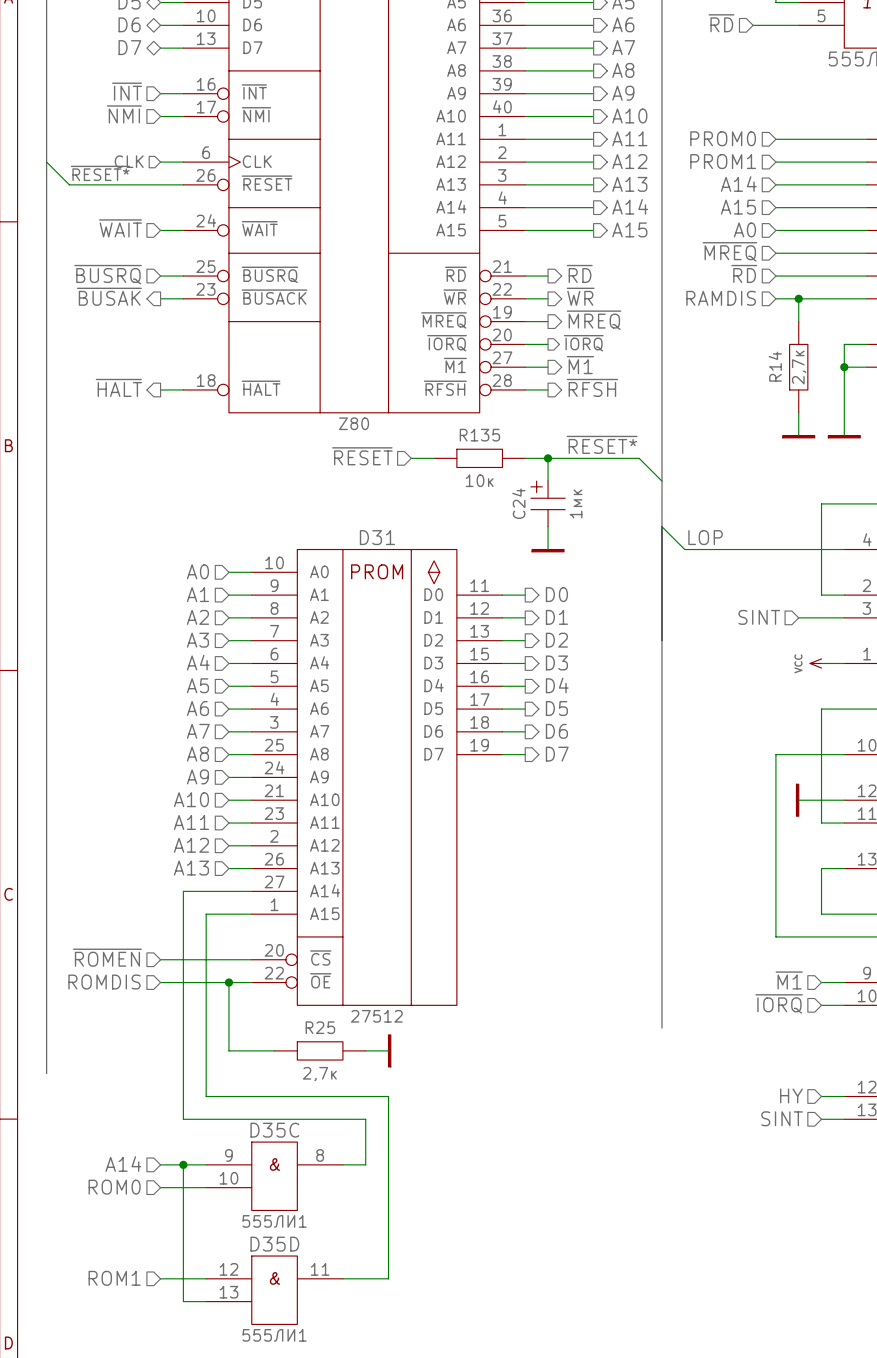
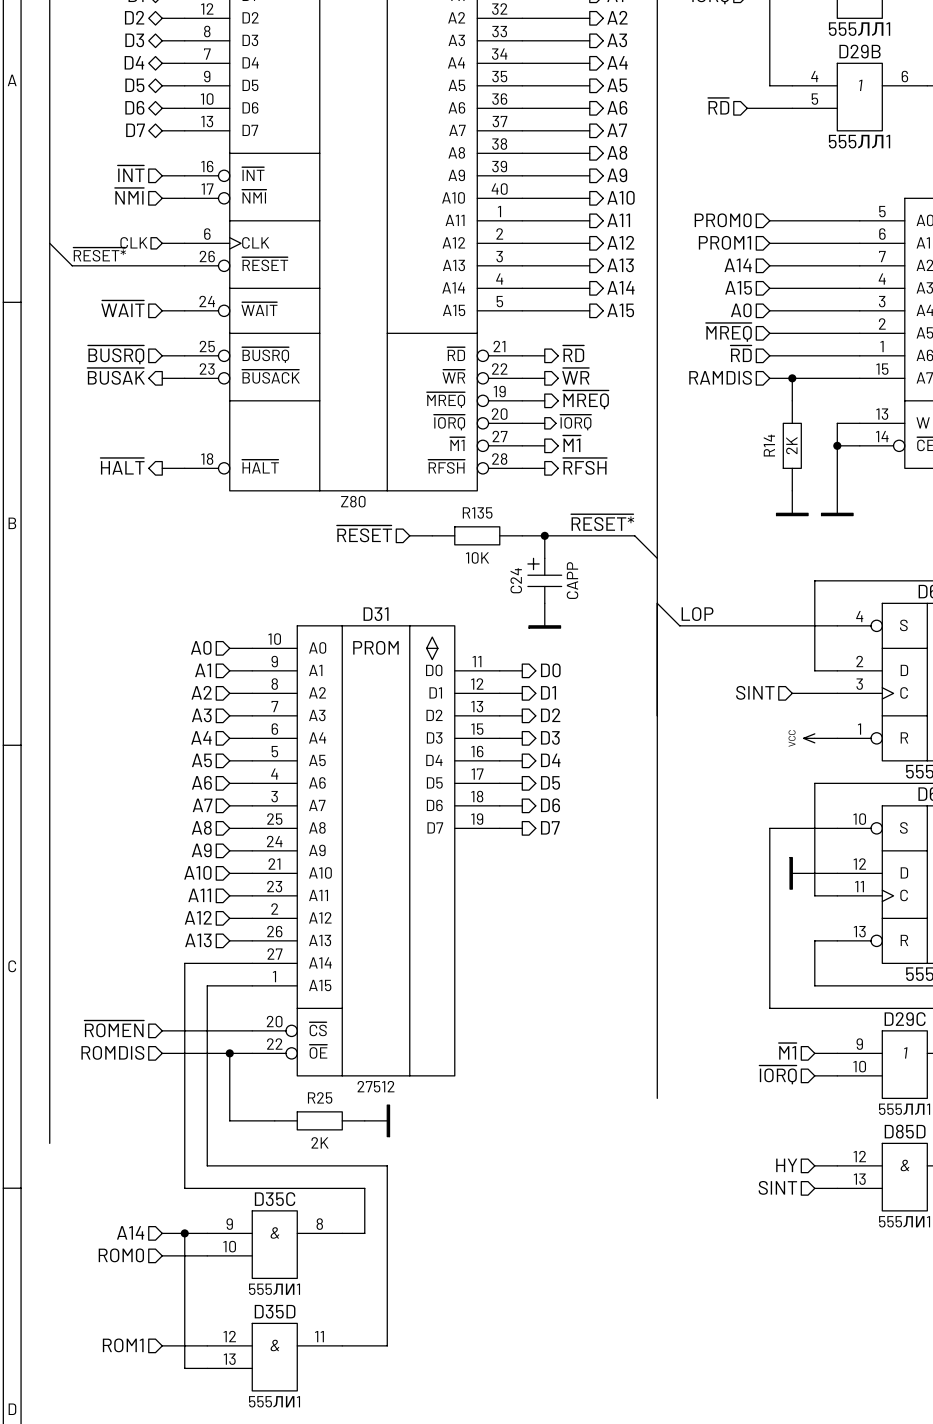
R14 value: 2,7к (799, 367) -> 2K (791, 445)
R135 value: 10к (479, 480) -> 10K (477, 557)
C24 value: 1мк (576, 503) -> CAPP (572, 580)
R25 value: 2,7к (319, 1074) -> 2K (320, 1142)

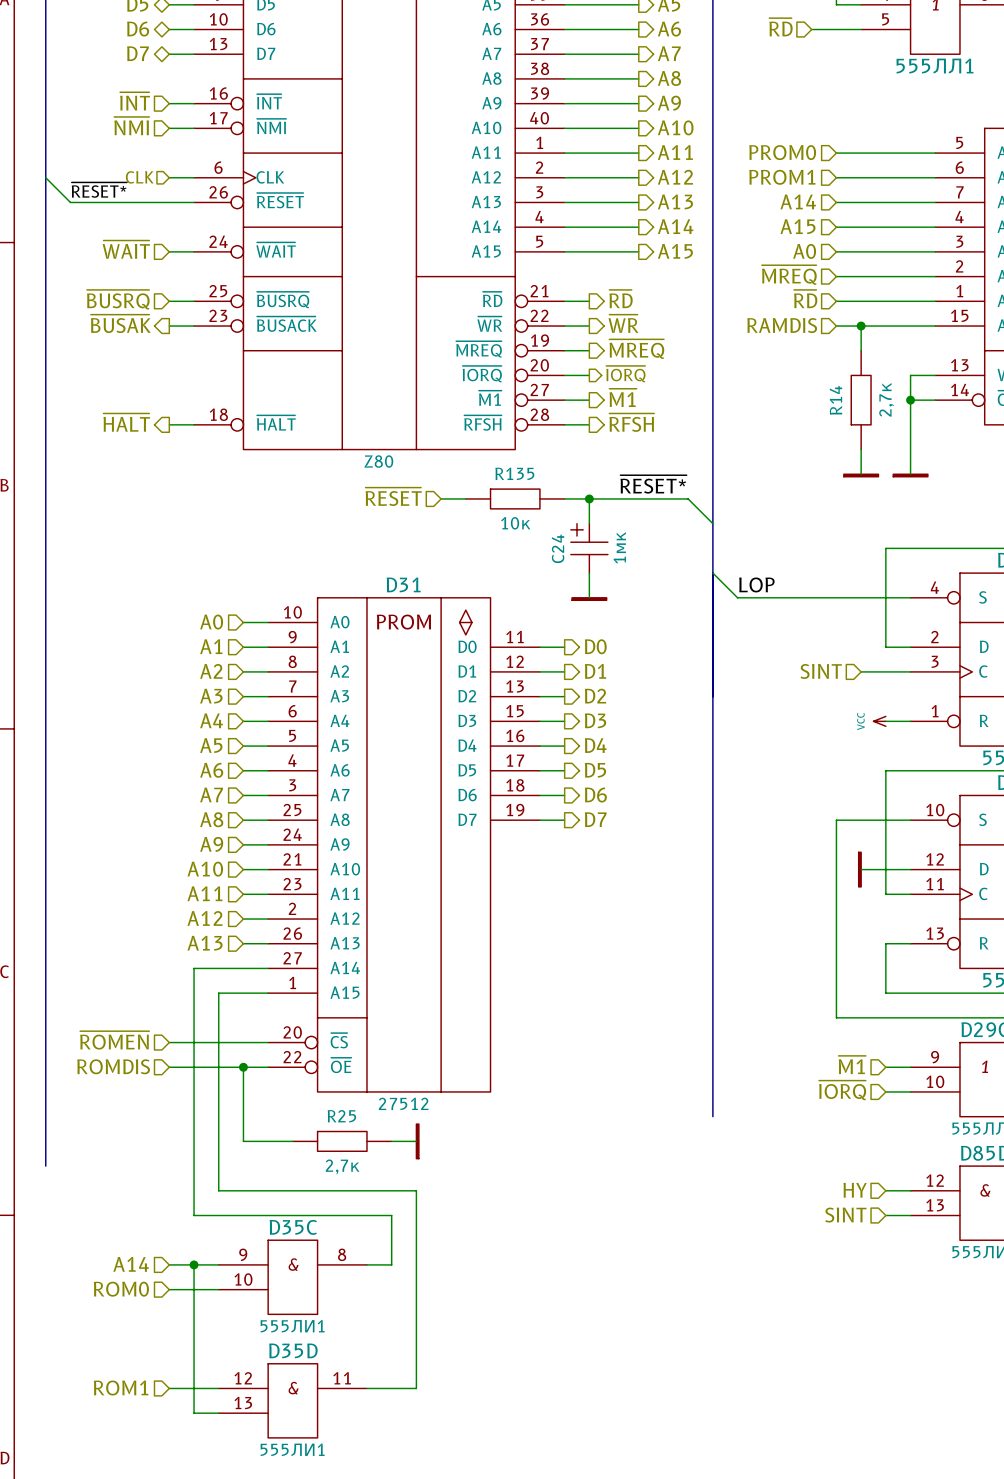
R14 value: 2K (791, 445) -> 2,7к (886, 399)
R135 value: 10K (477, 557) -> 10к (515, 523)
C24 value: CAPP (572, 580) -> 1мк (619, 547)
R25 value: 2K (320, 1142) -> 2,7к (342, 1166)

